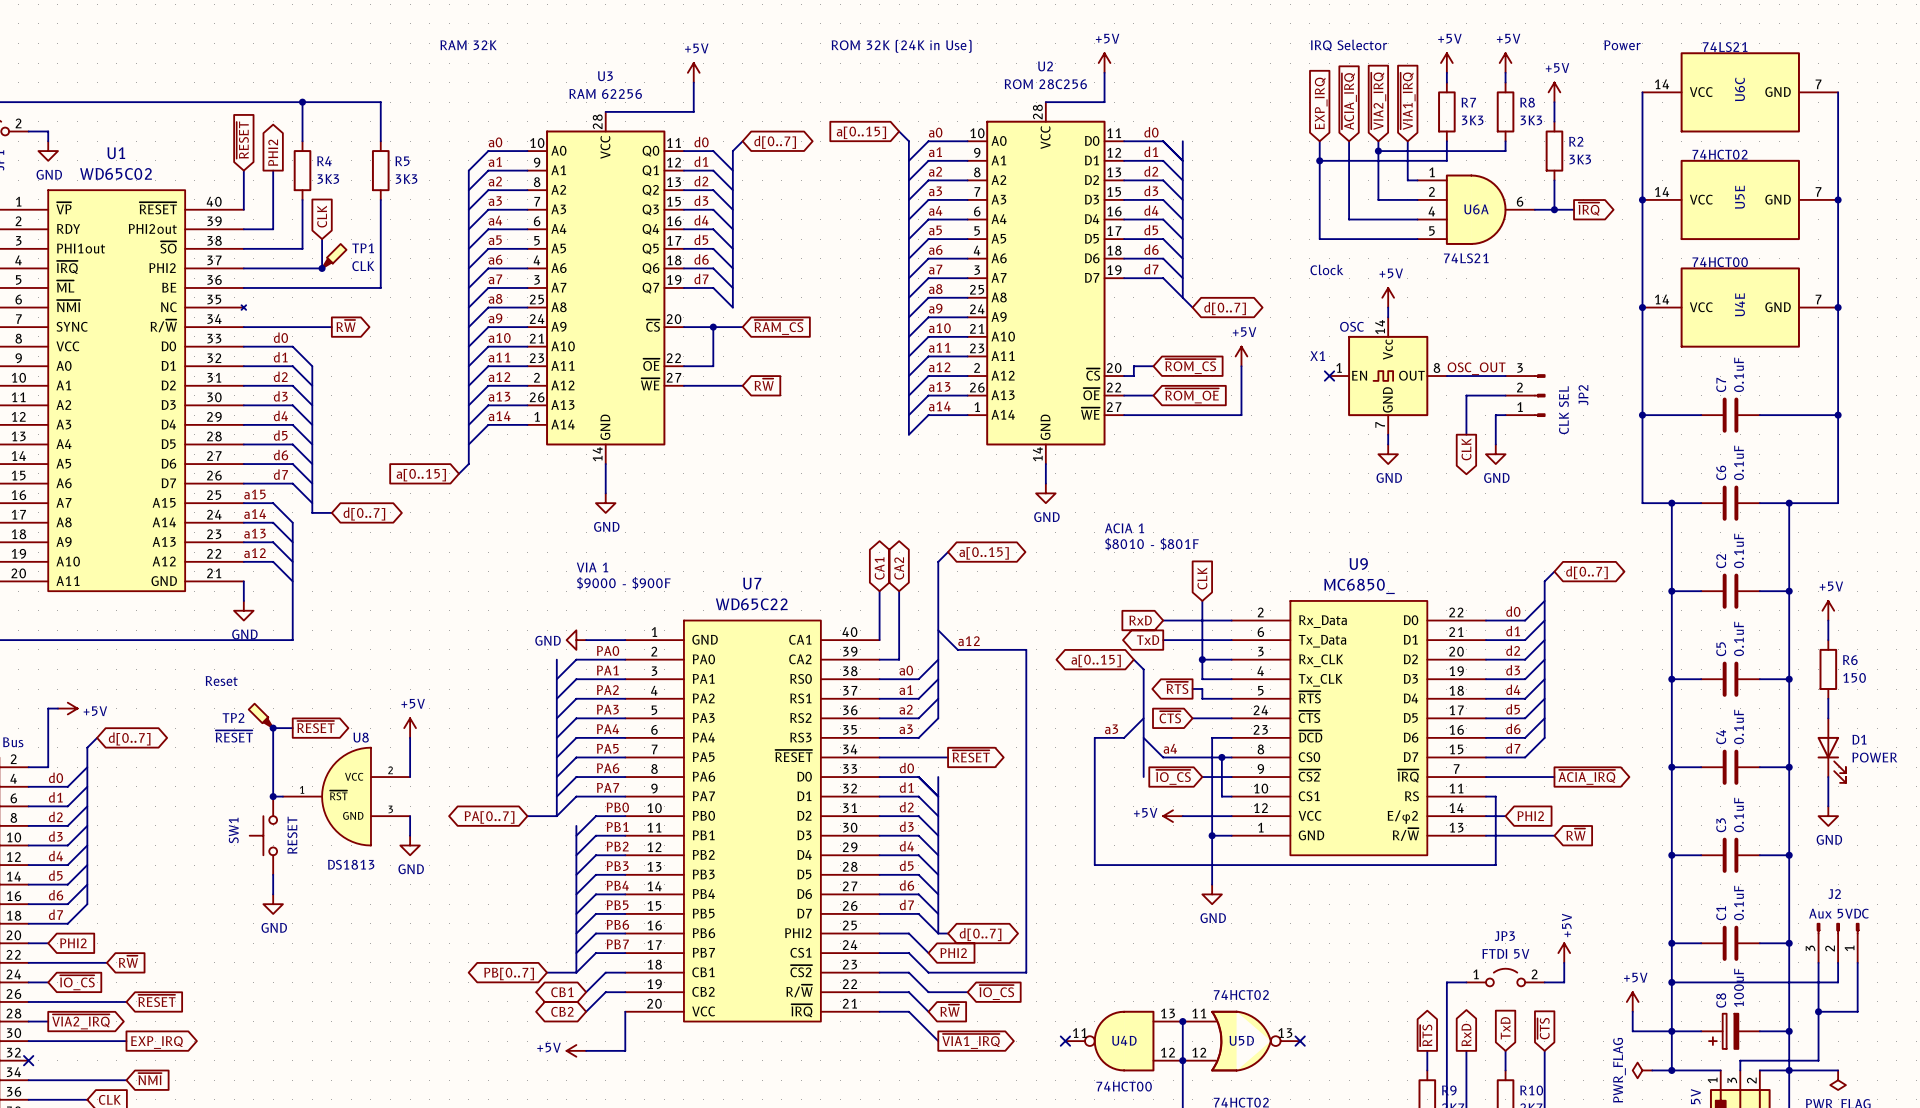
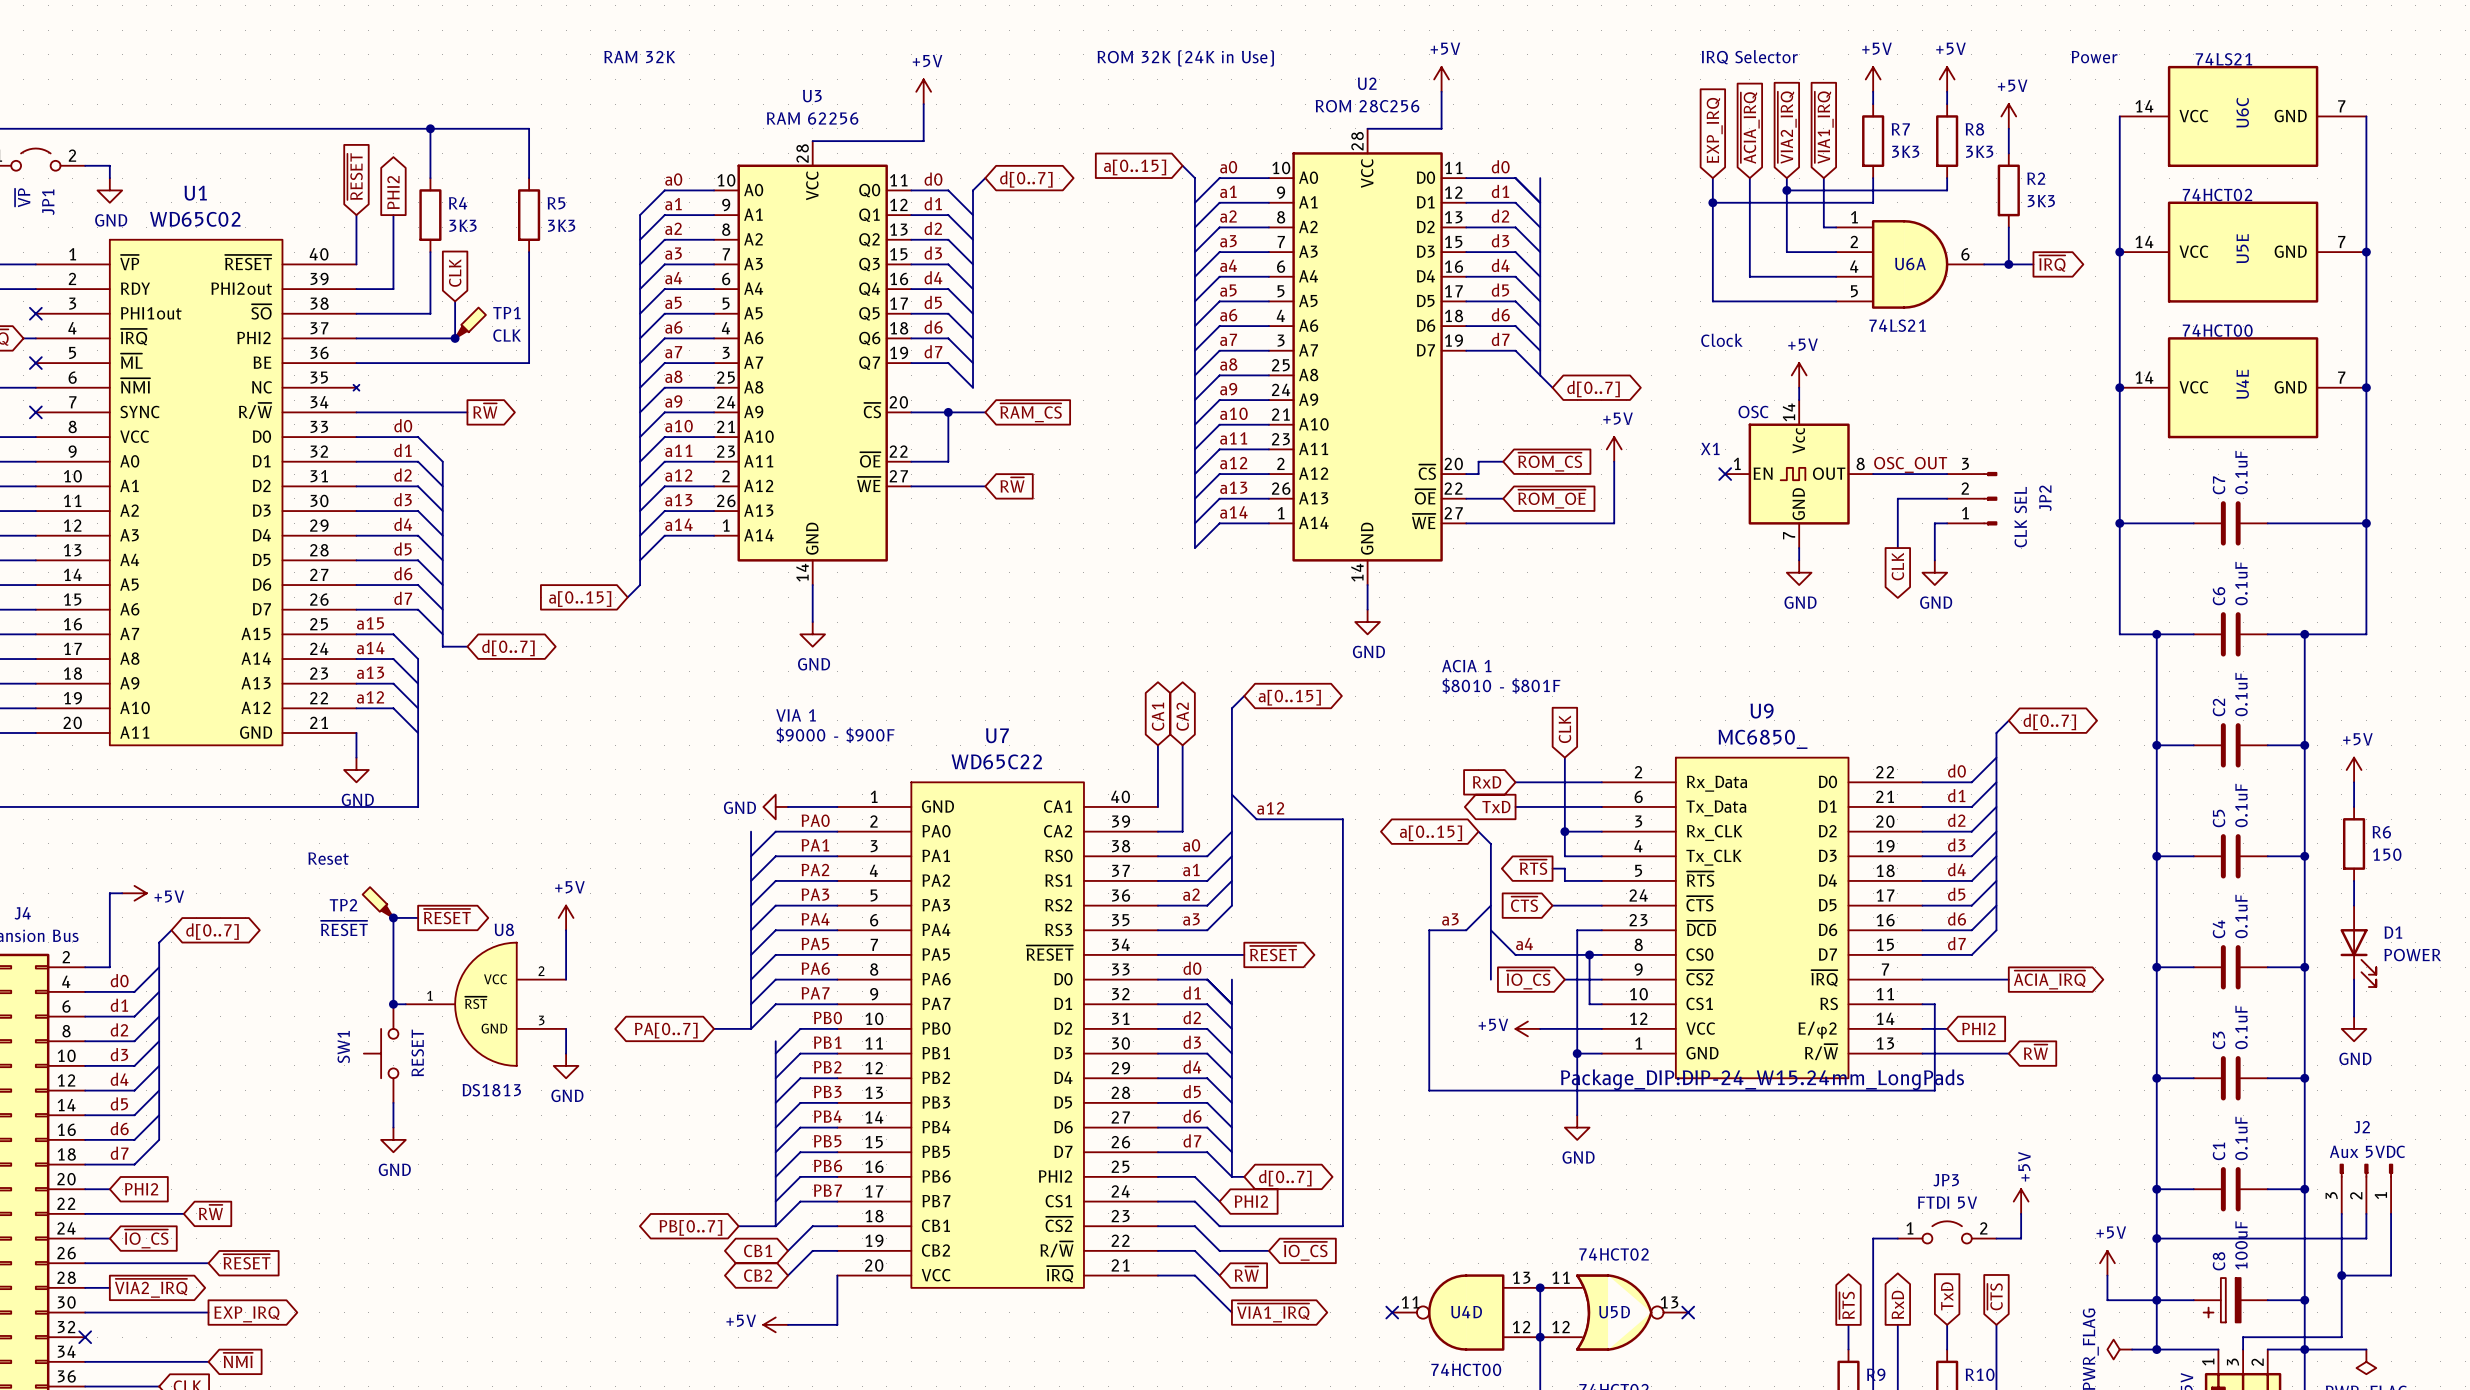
U9 text: none -> Package_DIP:DIP-24_W15.24mm_LongPads (1762, 1079)

